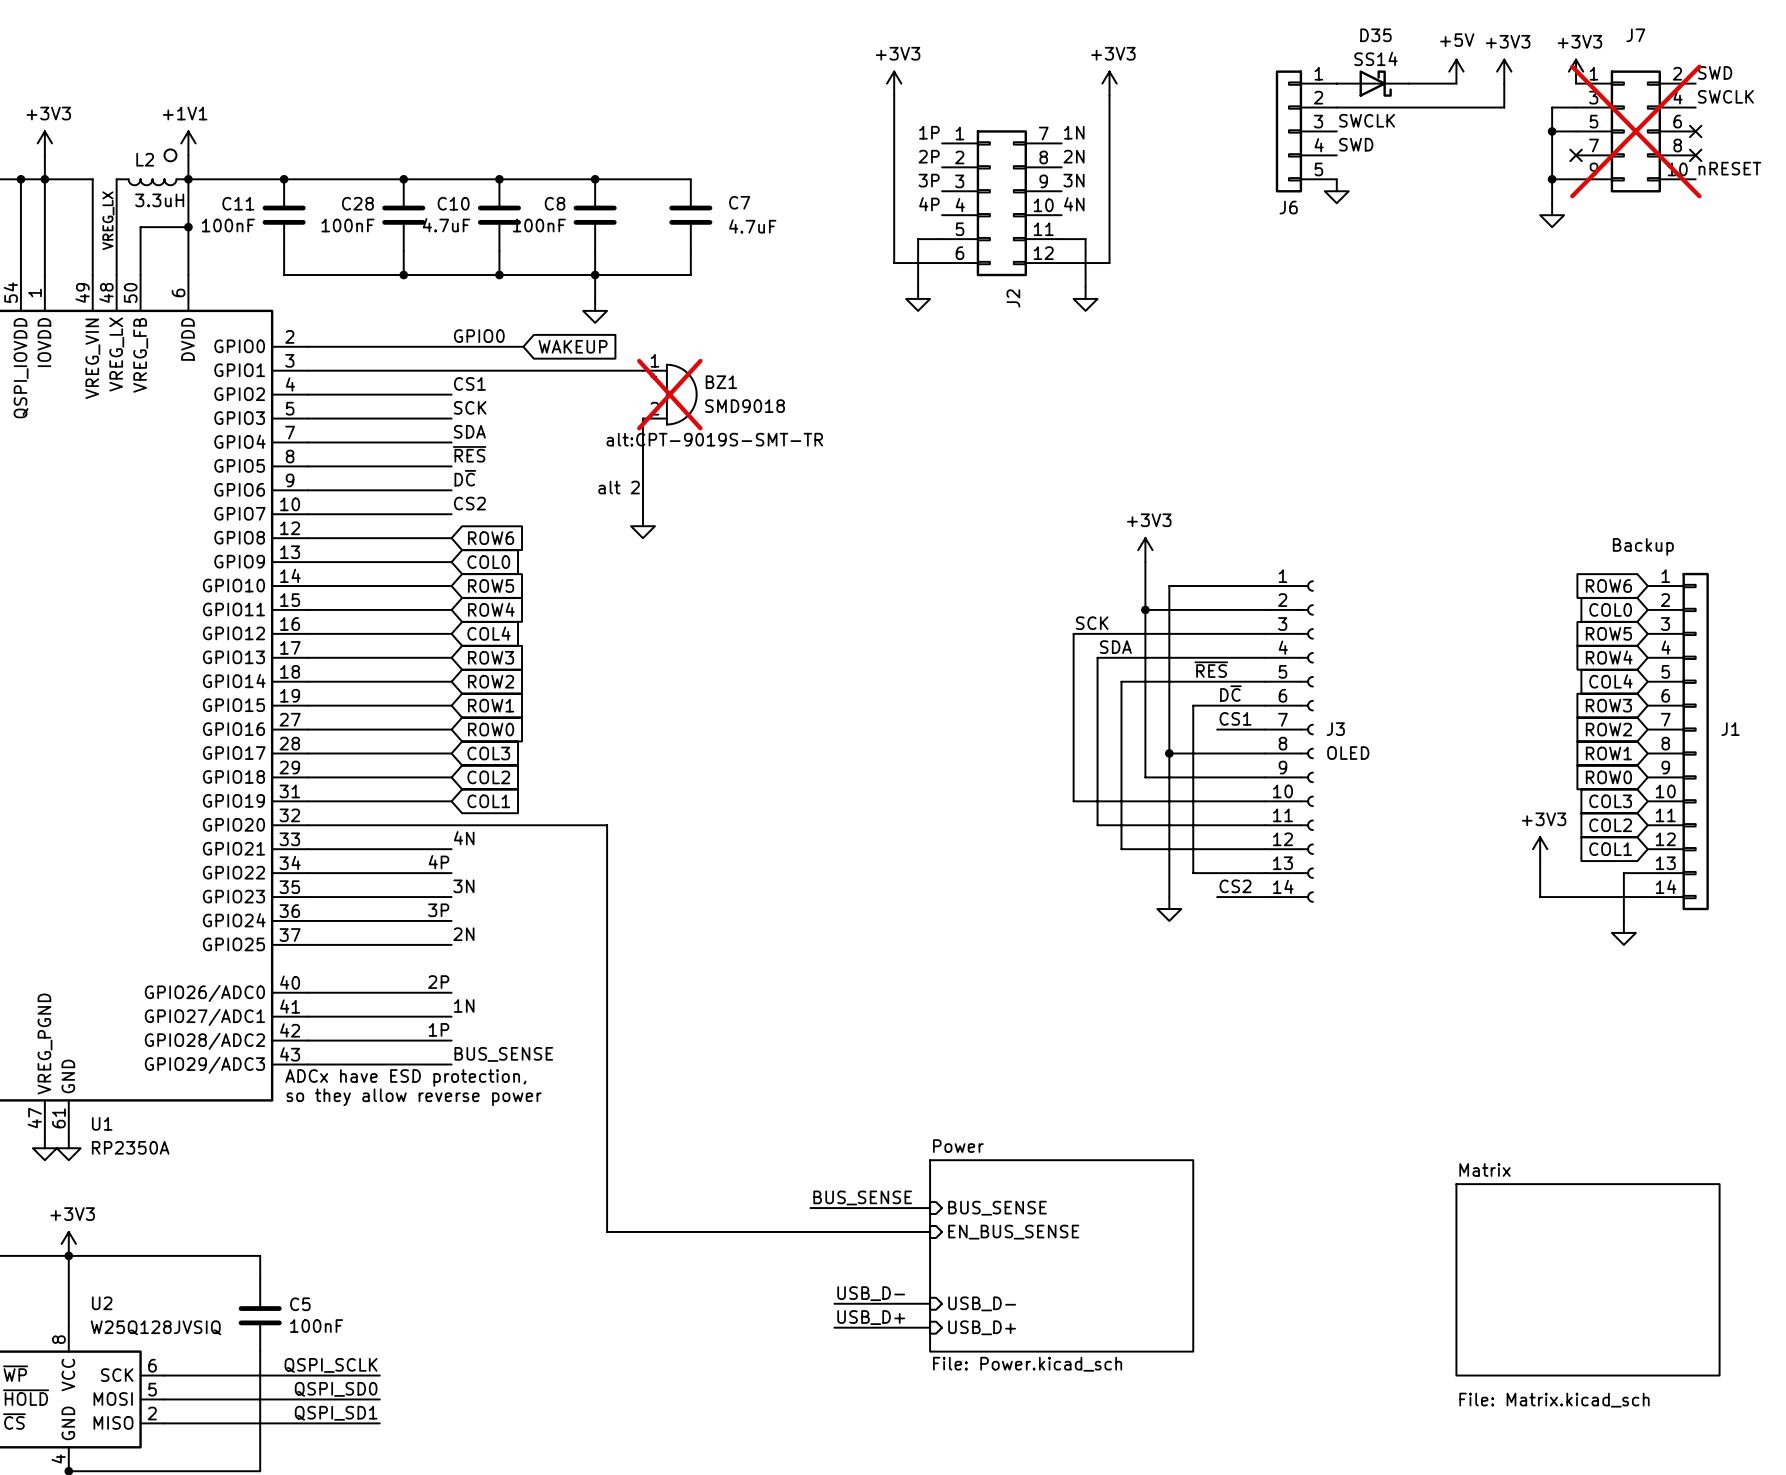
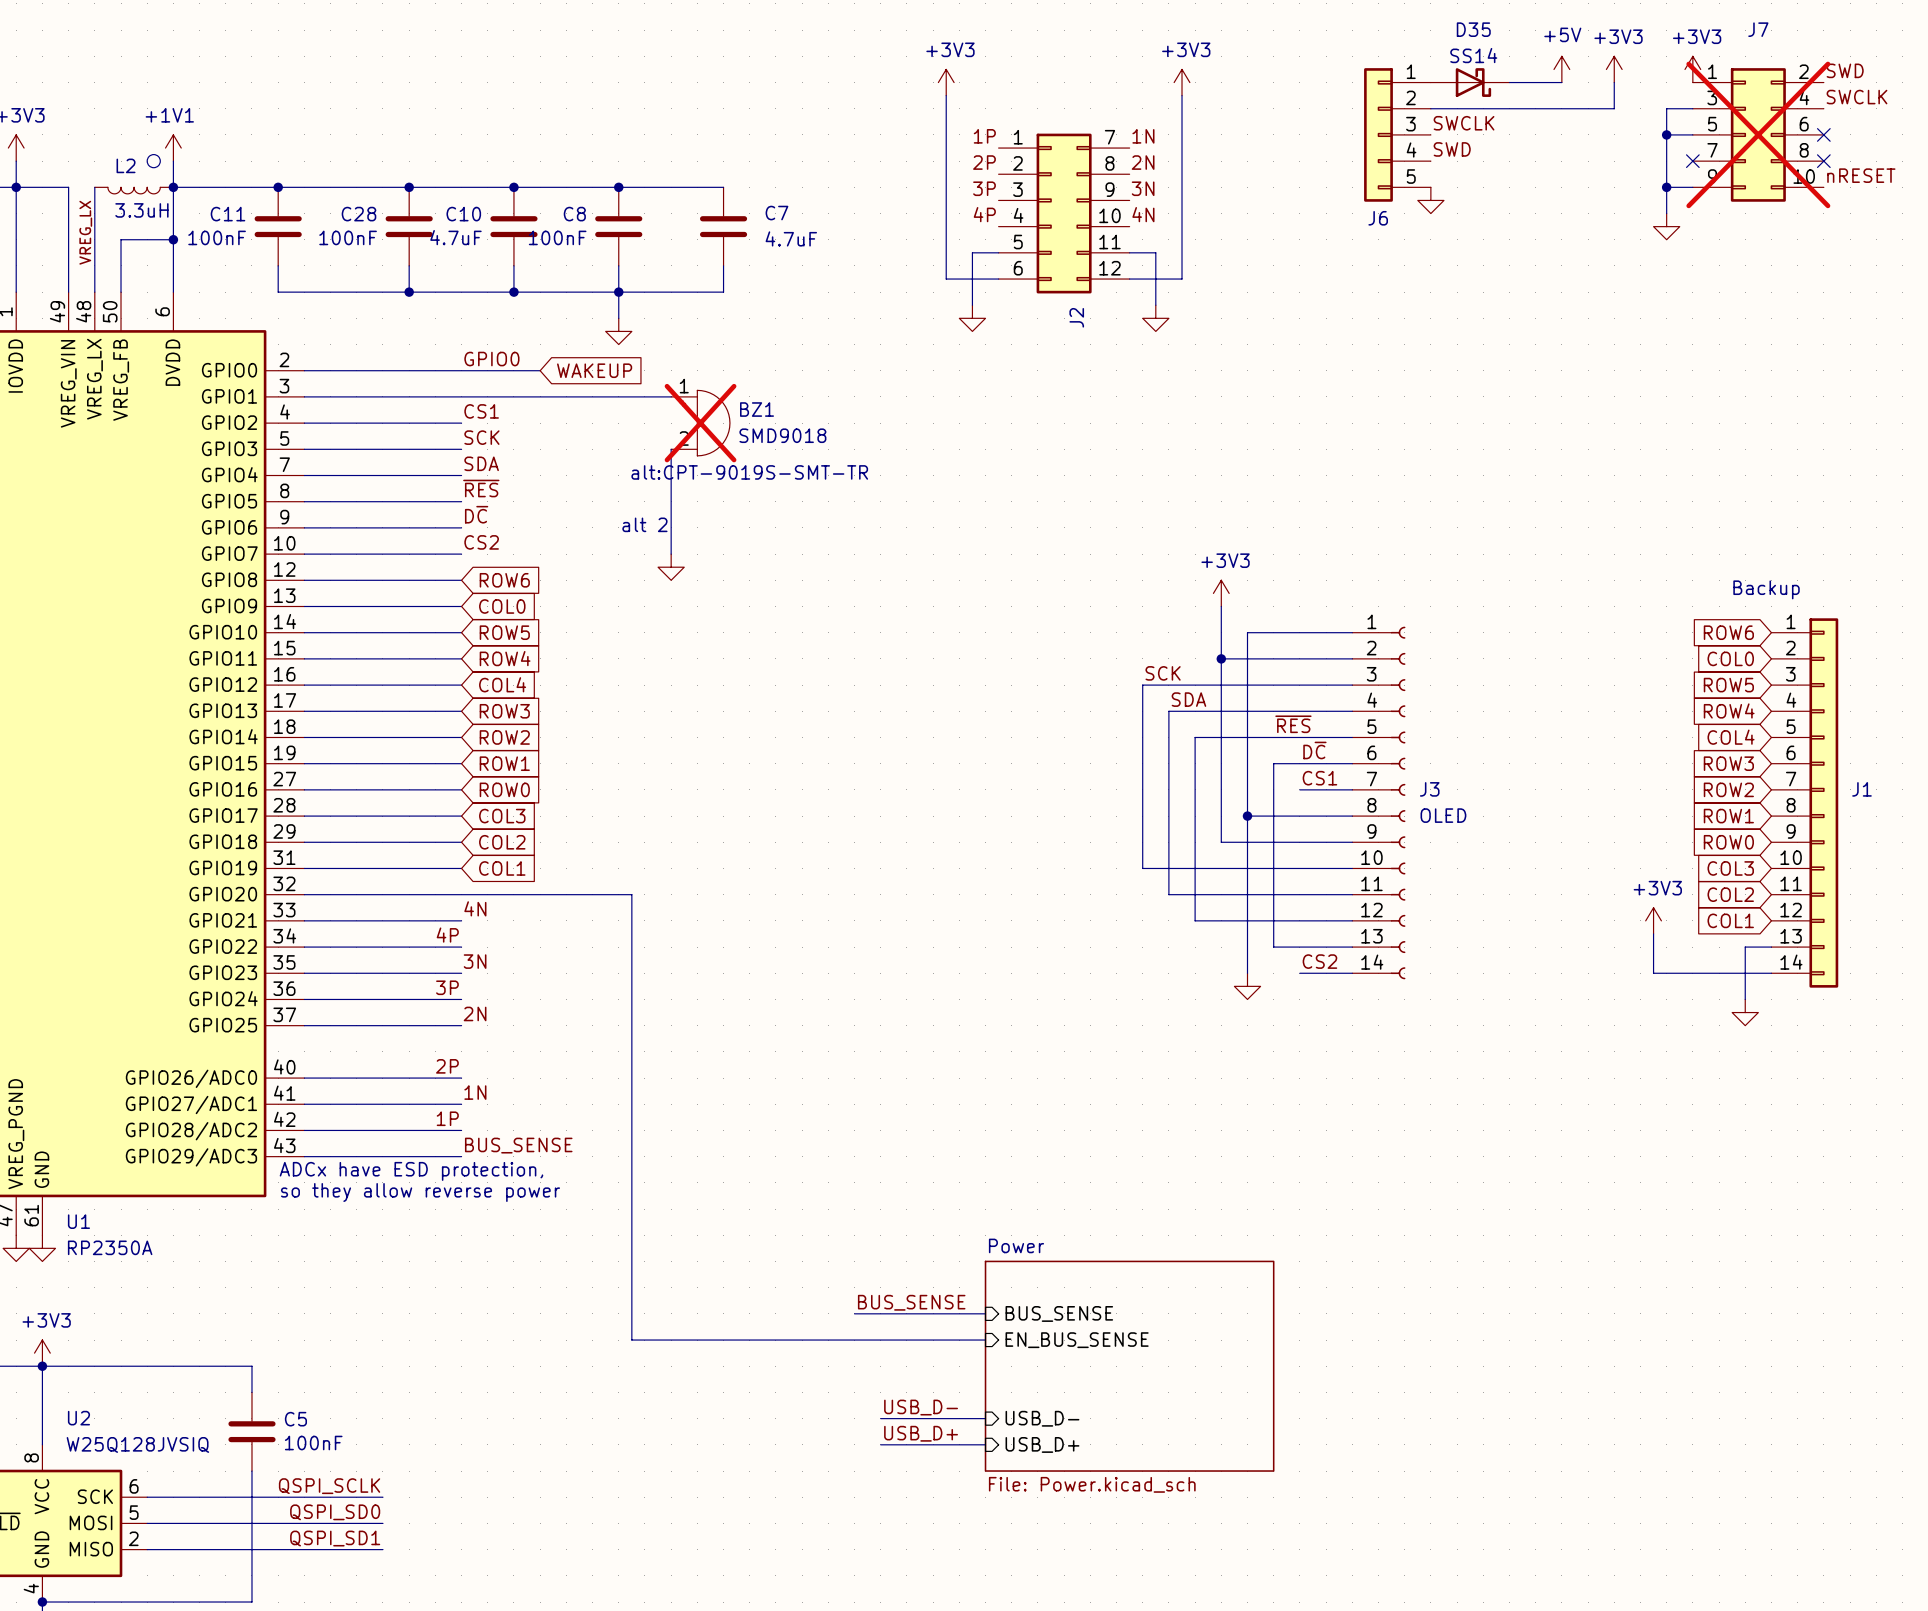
sheet Matrix: File: Matrix.kicad_sch (1588, 1279) -> none

